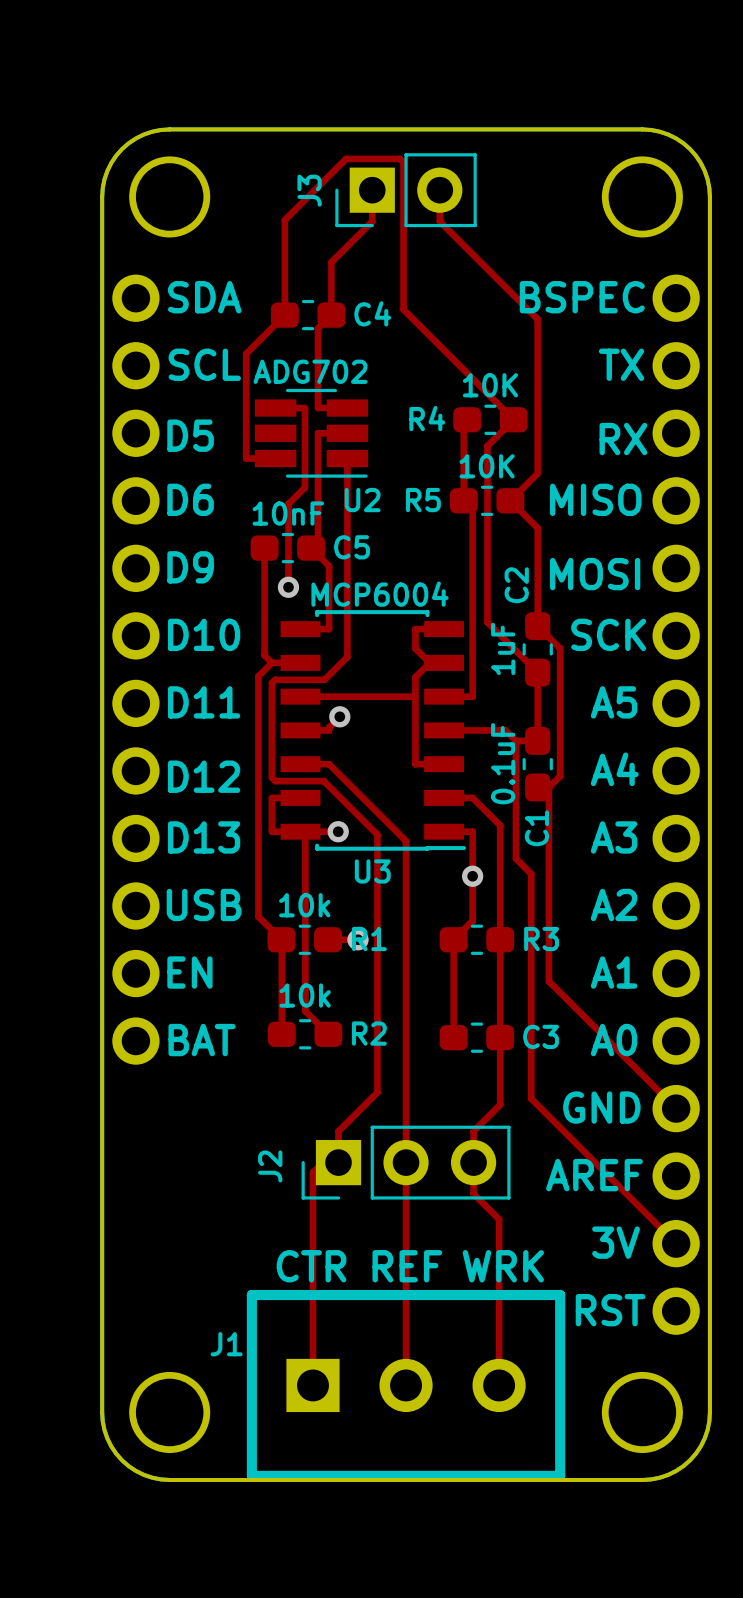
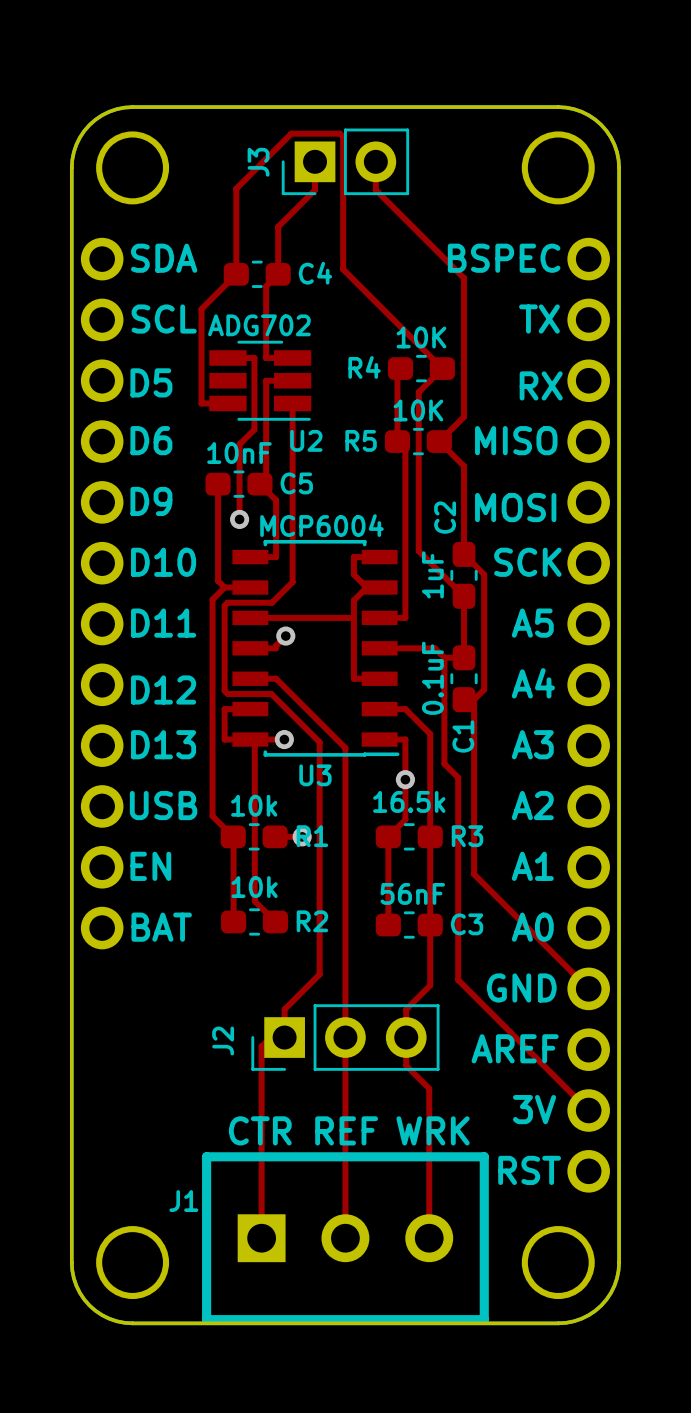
R3 value: none -> 16.5k (409, 801)
C3 value: none -> 56nF (412, 893)

